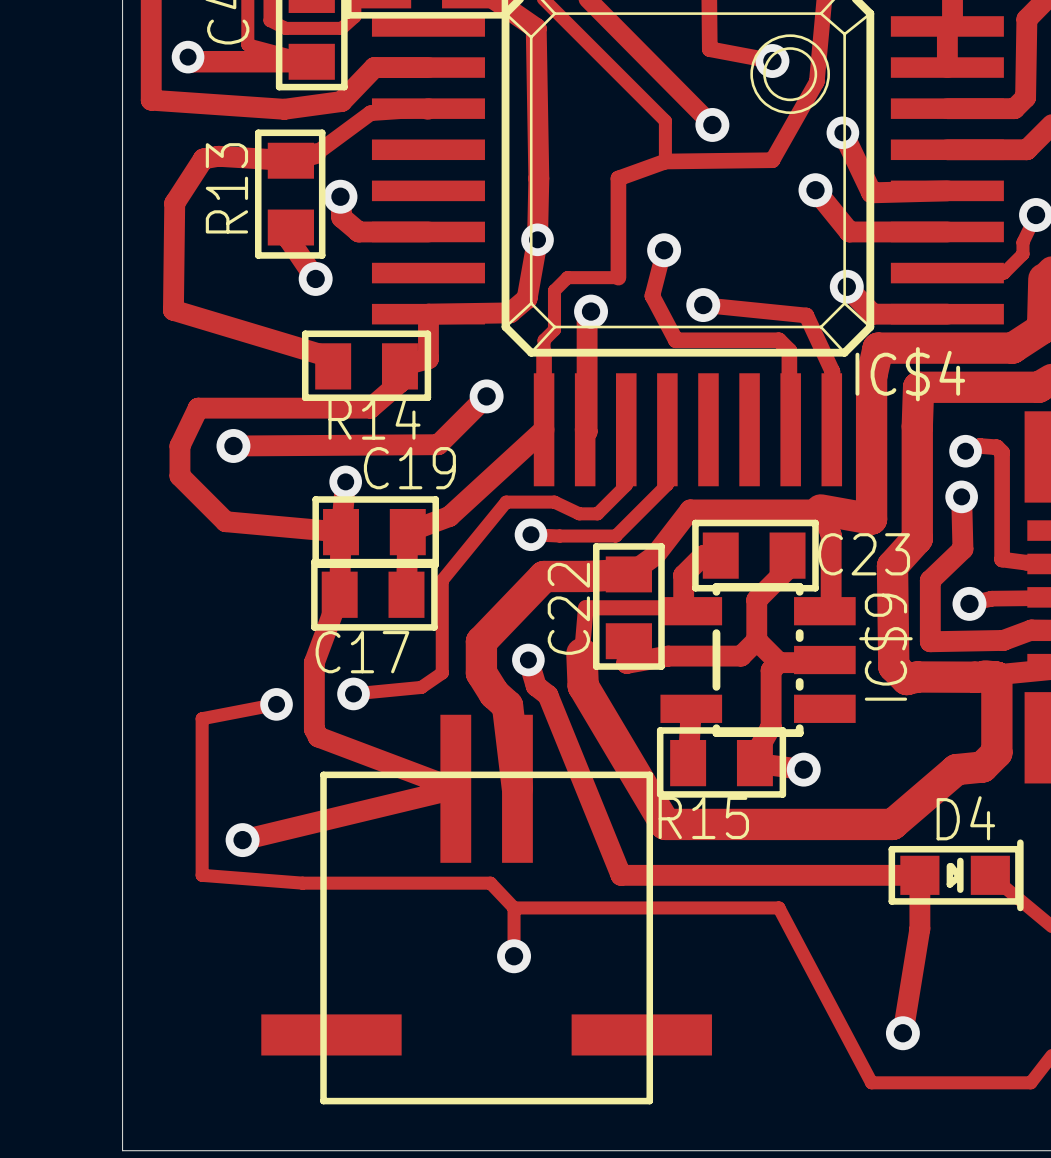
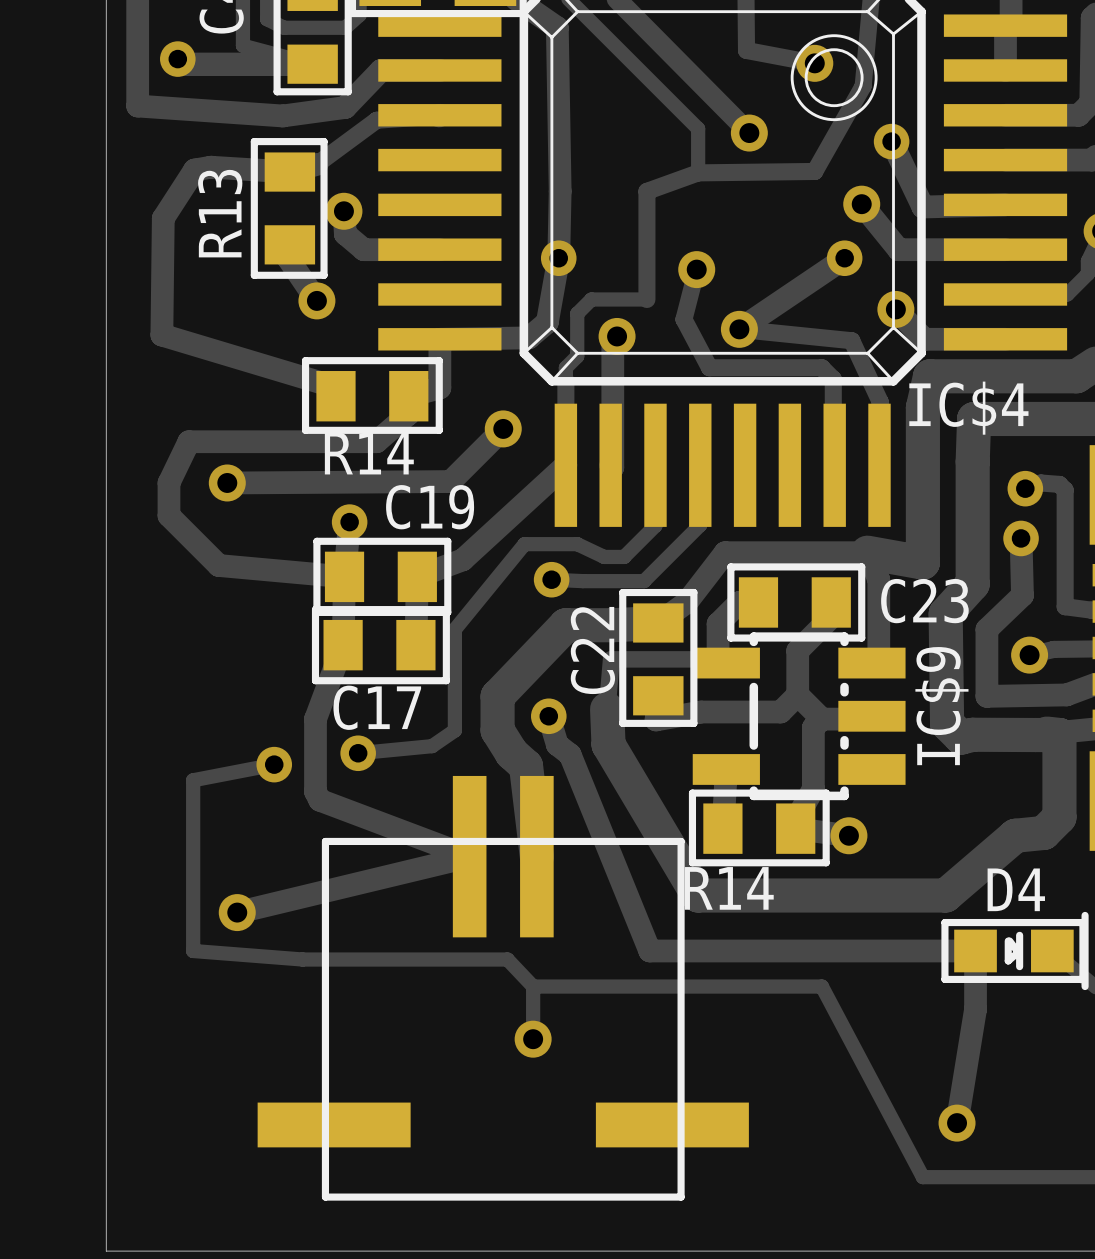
track: none -> (844, 258) (739, 329)
via: none -> (844, 258)
R15 name: R15 (703, 817) -> R14 (729, 888)

